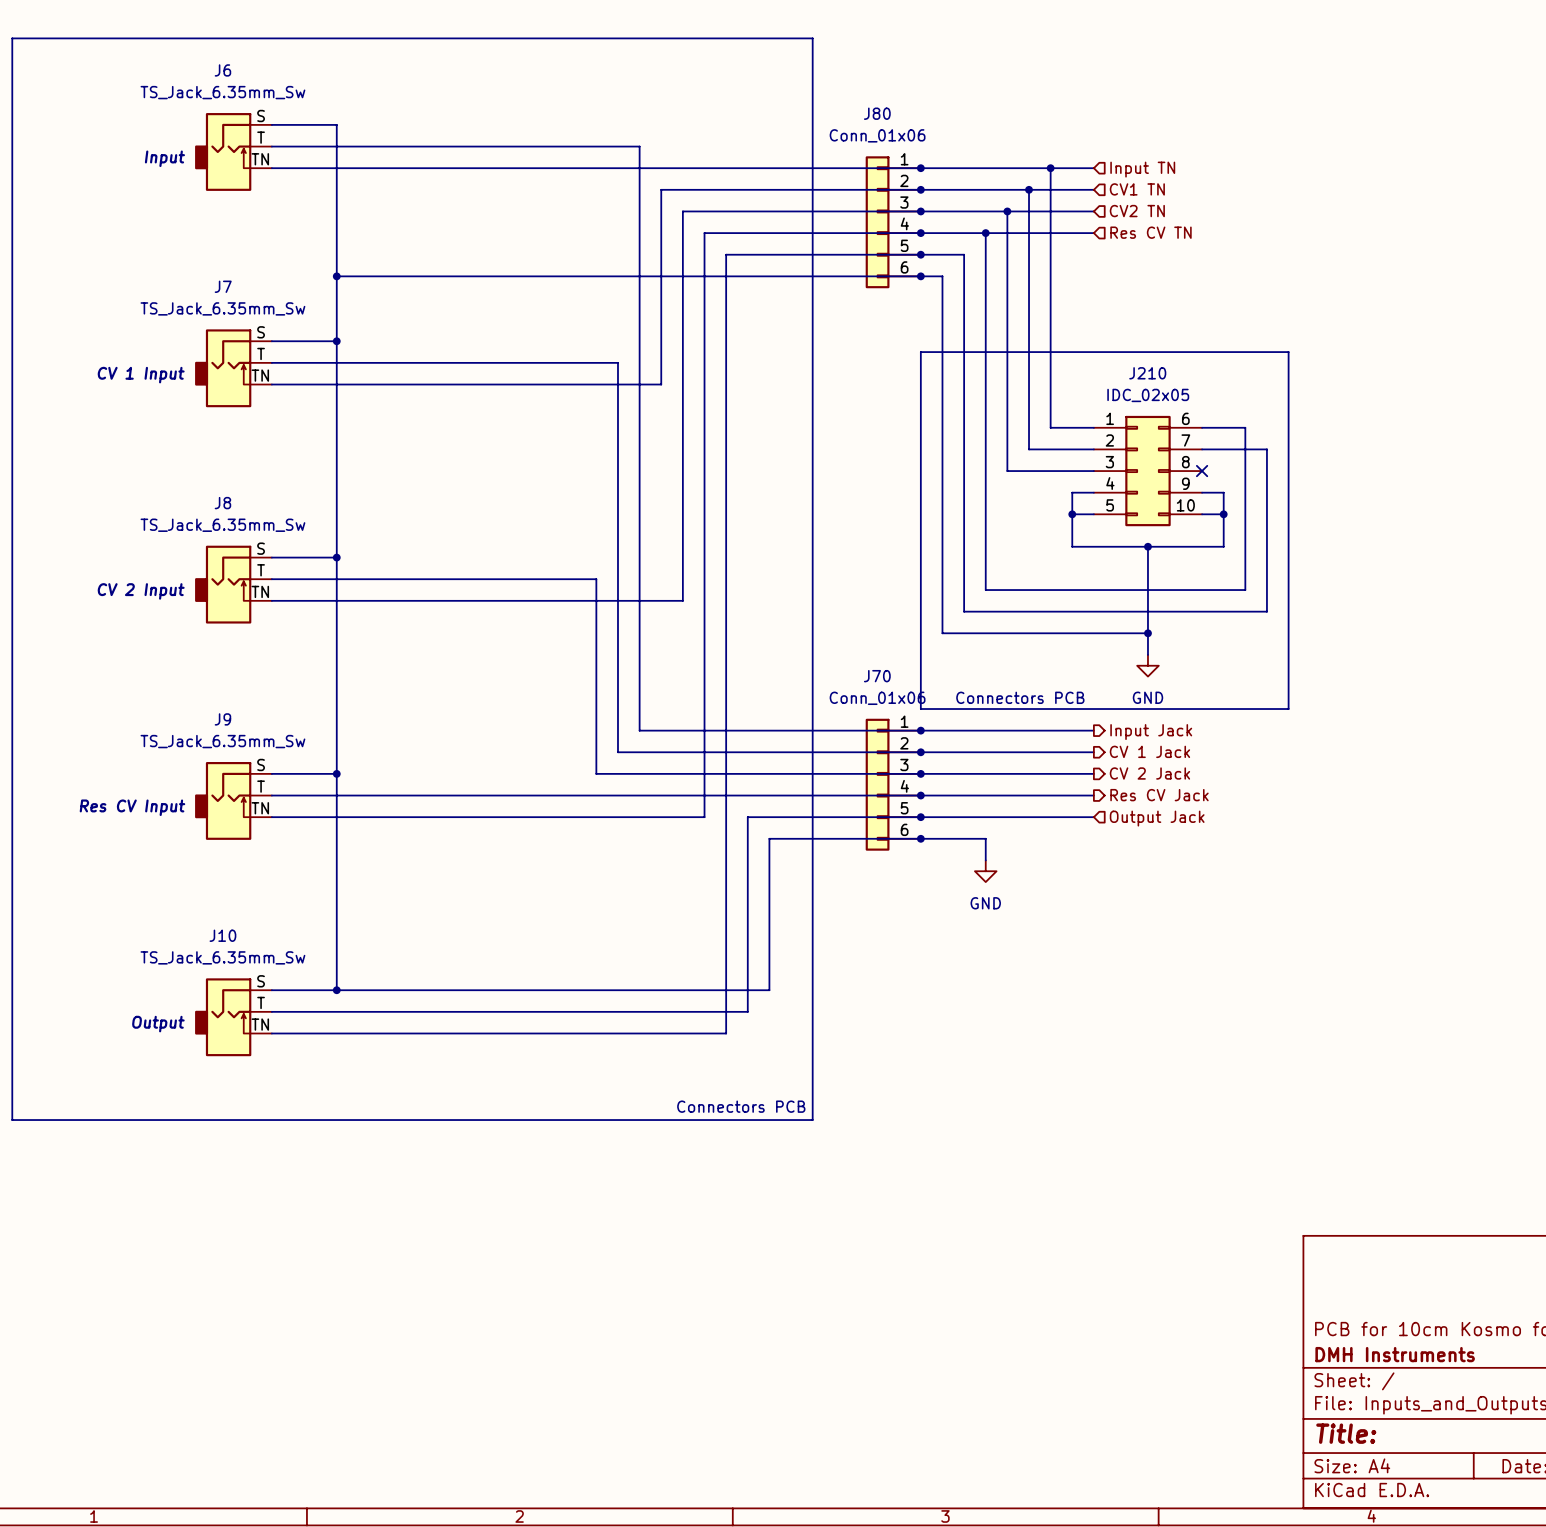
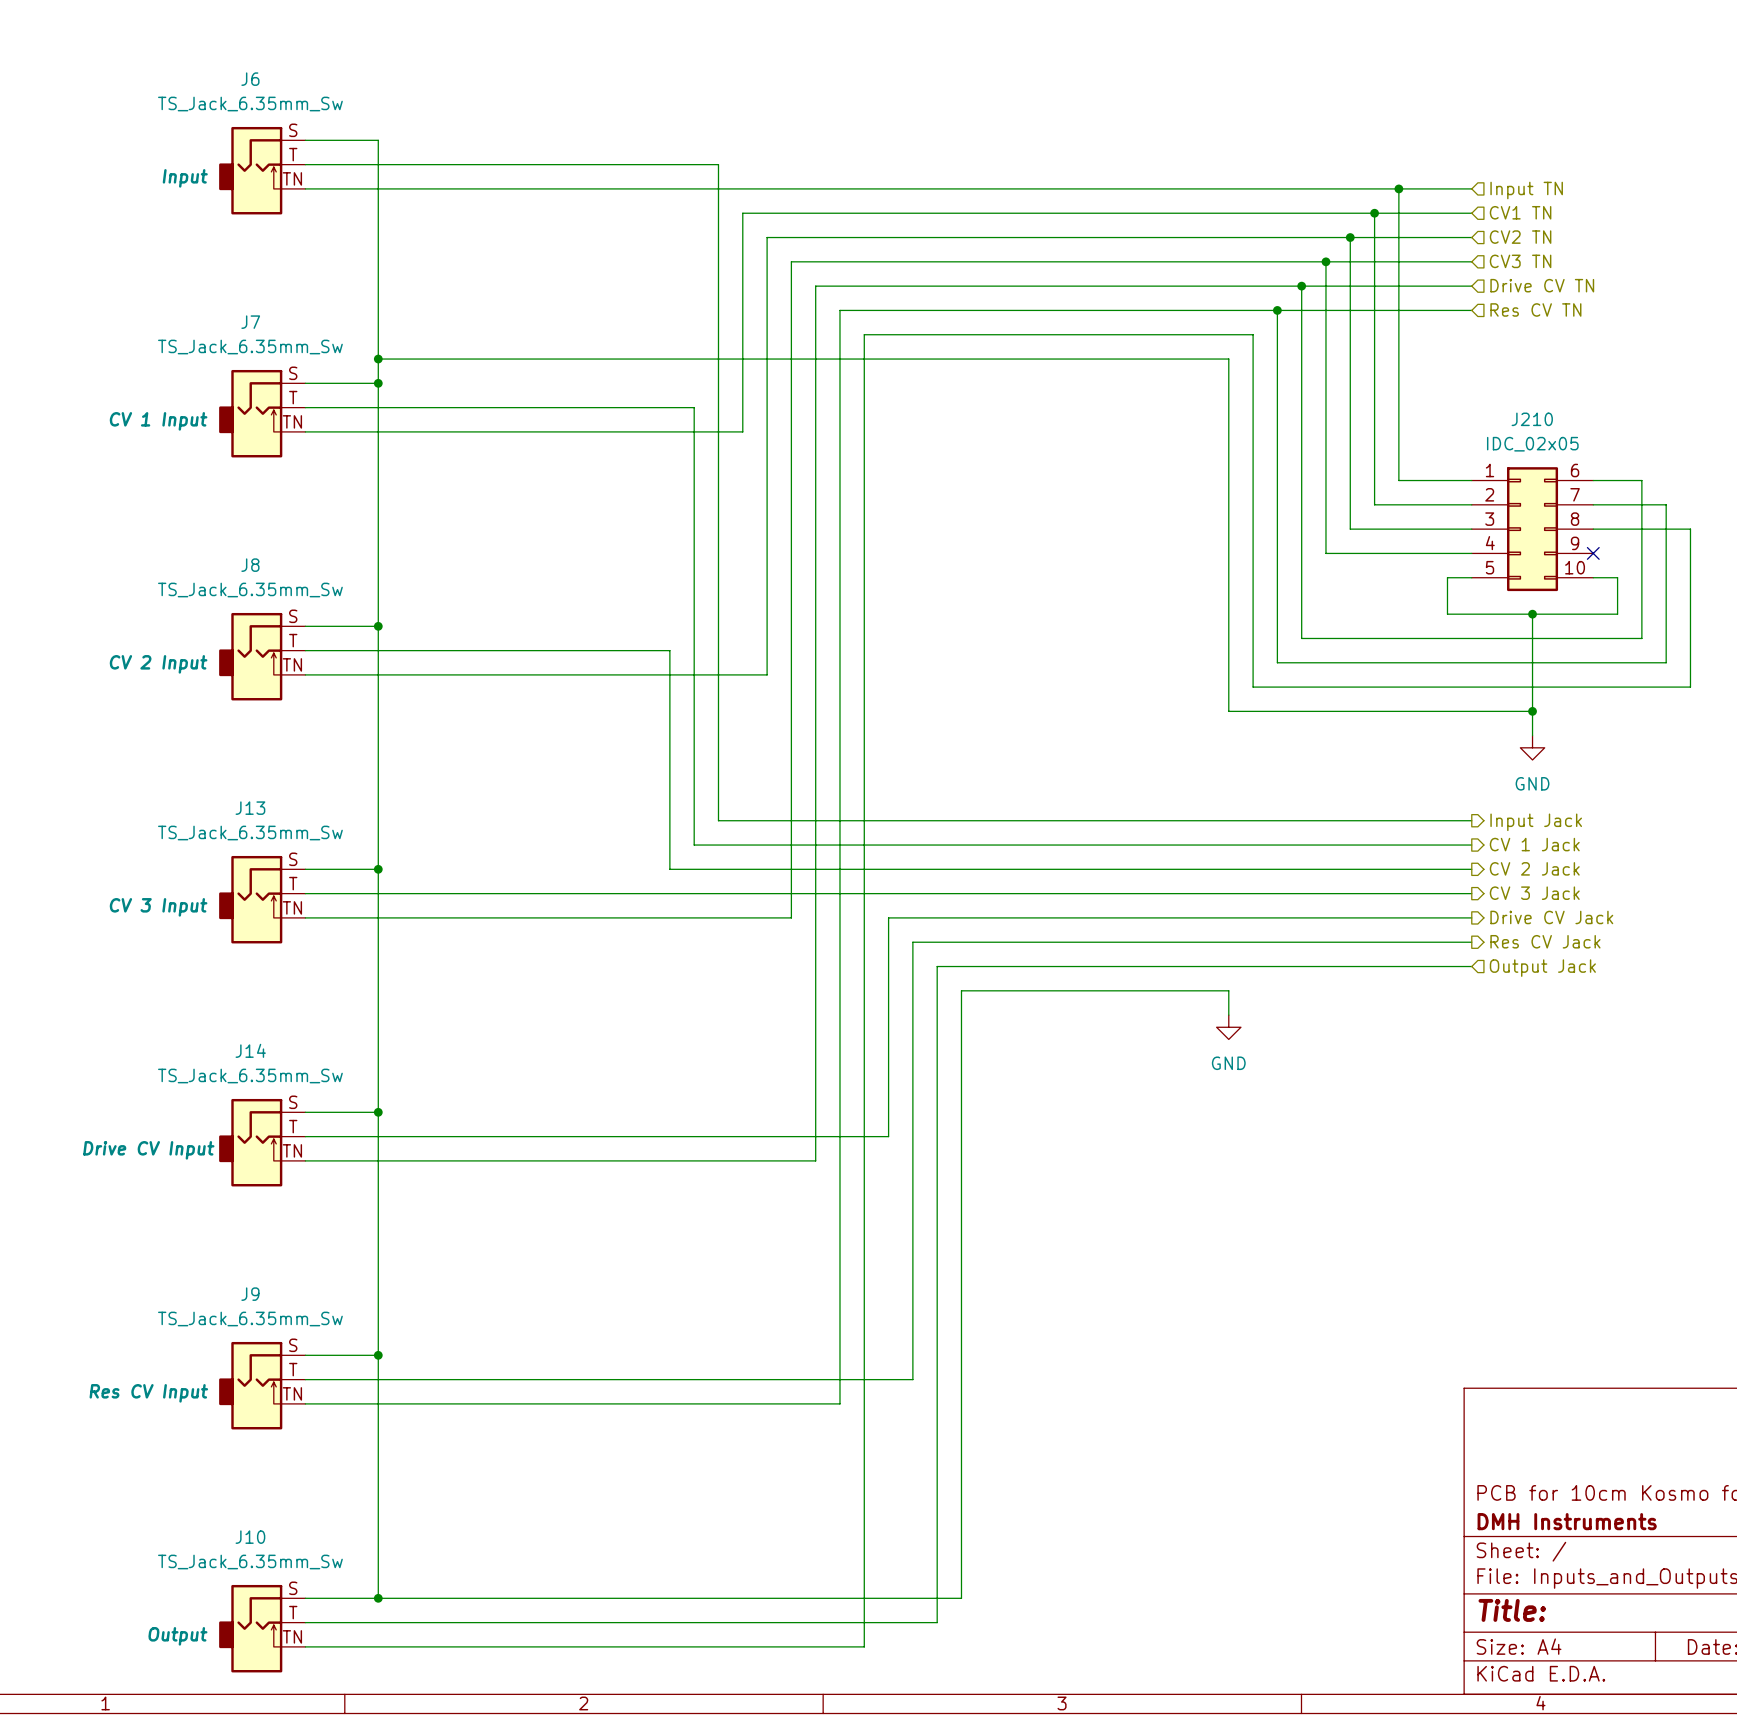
line: (12, 38) (812, 38) (812, 1120) (12, 1120) (12, 38) -> none
junction: (920, 168) -> none
wire: (1050, 168) (1050, 427) (1093, 427) -> none
junction: (1050, 168) -> none
wire: none -> (1228, 188) (1471, 188)
wire: none -> (1398, 188) (1398, 480) (1471, 480)
junction: none -> (1398, 188)
hierarchical label: Input TN (1142, 169) -> none
hierarchical label: none -> Input TN (1526, 190)
junction: (920, 189) -> none
wire: (1029, 189) (1029, 449) (1093, 449) -> none
junction: (1029, 189) -> none
wire: none -> (1228, 213) (1471, 213)
hierarchical label: CV1 TN (1137, 189) -> none
junction: none -> (1374, 213)
hierarchical label: none -> CV1 TN (1520, 212)
junction: (920, 211) -> none
wire: (1007, 211) (1007, 471) (1093, 471) -> none
junction: (1007, 211) -> none
wire: none -> (1228, 237) (1471, 237)
hierarchical label: CV2 TN (1137, 211) -> none
wire: none -> (1350, 237) (1350, 529) (1471, 529)
junction: none -> (1350, 237)
hierarchical label: none -> CV2 TN (1520, 237)
J80: Conn_01x06 (893, 222) -> none
hierarchical label: Res CV TN (1150, 232) -> none
hierarchical label: none -> CV3 TN (1520, 261)
junction: (920, 233) -> none
wire: (985, 233) (985, 590) (1137, 590) -> (1277, 310) (1277, 662)
junction: (985, 233) -> none
wire: none -> (1228, 261) (1471, 261)
wire: none -> (1325, 261) (1325, 553) (1350, 553)
junction: none -> (1325, 261)
junction: (920, 254) -> none
wire: (964, 254) (964, 611) (1115, 611) -> (1082, 286) (1471, 286)
wire: none -> (1301, 286) (1301, 638) (1641, 638) (1641, 480) (1593, 480)
junction: none -> (1301, 286)
hierarchical label: none -> Drive CV TN (1542, 285)
hierarchical label: none -> Res CV TN (1535, 309)
wire: (336, 276) (747, 276) -> none
junction position: (336, 276) -> (378, 359)
junction: (920, 276) -> none
wire: (942, 276) (942, 633) (1093, 633) -> (1058, 310) (1471, 310)
junction: none -> (1277, 310)
wire: none -> (378, 359) (1228, 359) (1228, 711)
line: (920, 352) (1288, 352) (1288, 709) (920, 709) (920, 352) -> none
wire: (1202, 427) (1245, 427) (1245, 590) -> (1593, 504) (1666, 504) (1666, 662) (1398, 662)
wire: (1202, 449) (1223, 449) -> (1374, 213) (1374, 504)
wire: (1266, 449) (1266, 611) -> (1593, 529) (1690, 529) (1690, 687) (1423, 687)
wire: none -> (1423, 504) (1471, 504)
J210 position: (1147, 471) -> (1532, 529)
no-connect mark: (1202, 471) -> none
wire: (1093, 492) (1072, 492) (1072, 546) (1223, 546) (1223, 492) -> (1471, 553) (1374, 553)
no-connect mark: none -> (1593, 553)
wire: (1072, 514) (1093, 514) -> none
junction: (1072, 514) -> none
wire: (1202, 514) (1223, 514) -> none
junction: (1223, 514) -> none
wire: none -> (1471, 577) (1447, 577) (1447, 614) (1617, 614) (1617, 577) (1593, 577)
wire: (1147, 546) (1147, 654) -> none
junction: (1147, 546) -> none
wire: none -> (1532, 614) (1532, 735)
junction: none -> (1532, 614)
wire: none -> (1289, 711) (1532, 711)
junction: (1147, 633) -> none
junction: none -> (1532, 711)
power symbol: GND (1147, 665) -> none
power symbol: none -> GND (1532, 747)
text: Connectors PCB (1020, 697) -> none
J9 name: J9 (222, 719) -> J13 (250, 808)
junction: (920, 730) -> none
wire: none -> (1228, 820) (1471, 820)
hierarchical label: Input Jack (1151, 732) -> none
hierarchical label: none -> Input Jack (1536, 822)
hierarchical label: CV 1 Jack (1149, 751) -> none
hierarchical label: none -> CV 1 Jack (1534, 844)
junction: (920, 752) -> none
wire: none -> (1228, 845) (1471, 845)
junction: (920, 773) -> none
wire: none -> (1228, 869) (1471, 869)
hierarchical label: CV 2 Jack (1149, 773) -> none
hierarchical label: none -> CV 2 Jack (1534, 868)
J70: Conn_01x06 (893, 784) -> none
junction: (920, 795) -> none
wire: none -> (1228, 893) (1471, 893)
hierarchical label: Res CV Jack (1159, 795) -> none
hierarchical label: none -> CV 3 Jack (1534, 893)
J9 text: Res CV Input (132, 807) -> CV 3 Input (158, 907)
hierarchical label: none -> Drive CV Jack (1551, 917)
wire: (747, 817) (791, 817) -> (839, 917) (839, 310)
wire: none -> (888, 917) (888, 1136) (839, 1136) (839, 1403) (305, 1403)
junction: (920, 817) -> none
wire: none -> (1228, 917) (1471, 917)
hierarchical label: Output Jack (1157, 818) -> none
wire: (769, 838) (812, 838) -> (864, 942) (864, 334) (1253, 334) (1253, 687)
wire: none -> (912, 942) (912, 1379) (305, 1379)
junction: (920, 838) -> none
wire: (985, 838) (985, 860) -> (1107, 942) (1471, 942)
hierarchical label: none -> Res CV Jack (1545, 941)
wire: none -> (1471, 966) (937, 966) (937, 1622) (305, 1622)
hierarchical label: none -> Output Jack (1542, 968)
power symbol position: GND (985, 871) -> GND (1228, 1027)
wire: none -> (1228, 1015) (1228, 990) (961, 990) (961, 1598) (305, 1598)
J10 name: J10 (222, 935) -> J14 (250, 1050)
wire: (336, 990) (769, 990) -> (305, 1646) (864, 1646) (864, 1112)
wire: none -> (378, 1112) (378, 1598)
J10 text: Output (158, 1024) -> Drive CV Input (148, 1150)
text: Connectors PCB (741, 1106) -> none
wire: none -> (305, 1355) (378, 1355)
junction: none -> (378, 1355)
J9: none -> TS_Jack_6.35mm_Sw (262, 1385)
junction: none -> (378, 1598)
J10: none -> TS_Jack_6.35mm_Sw (262, 1628)

